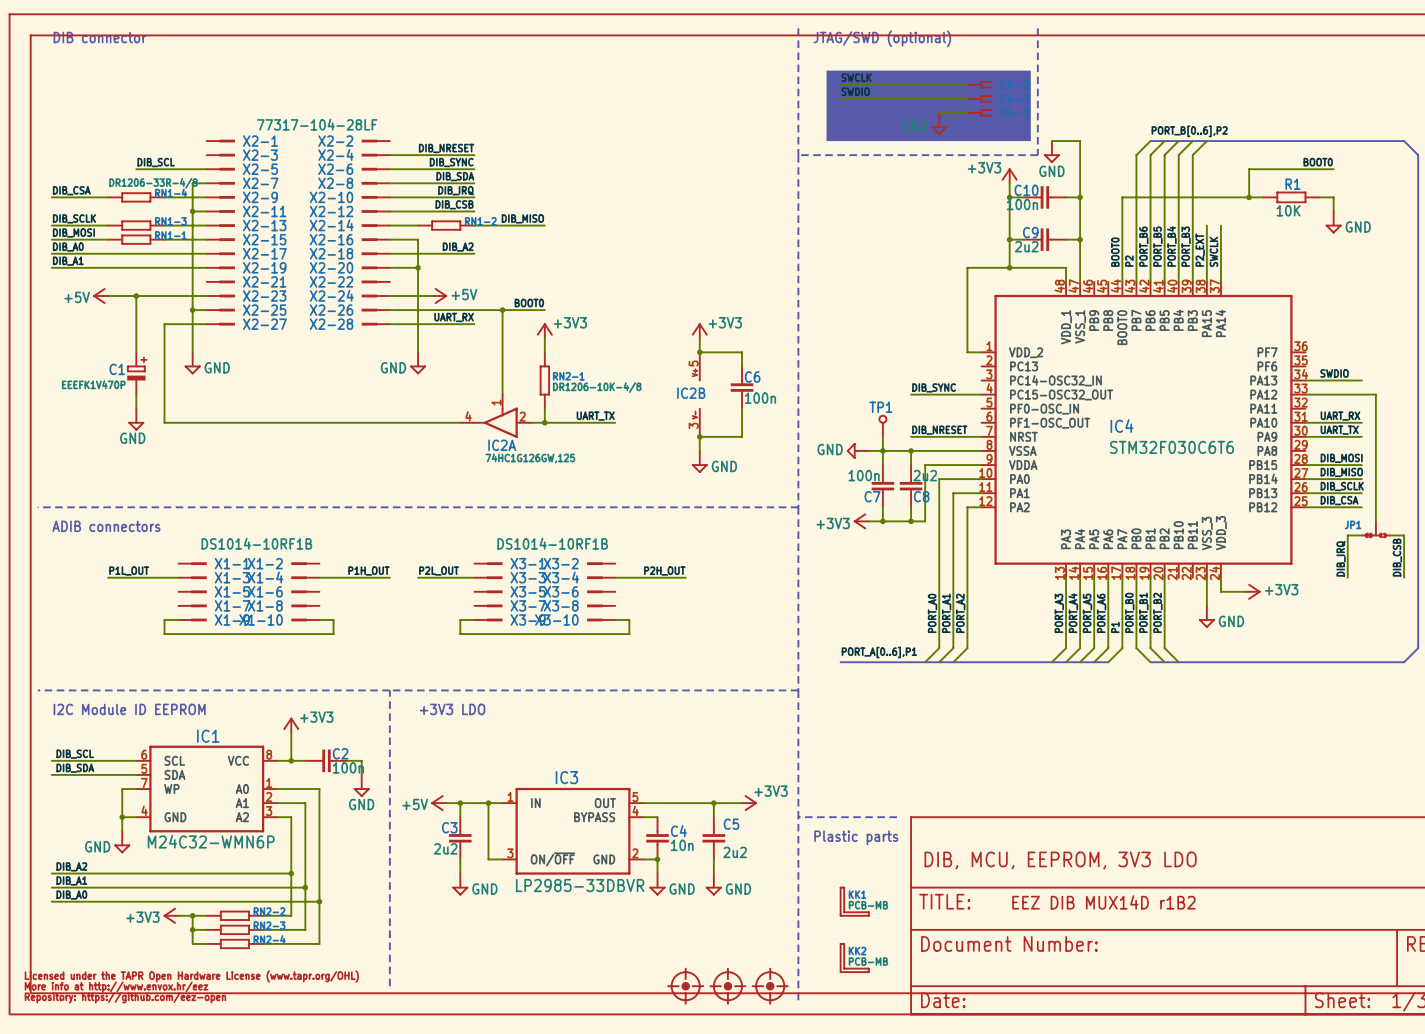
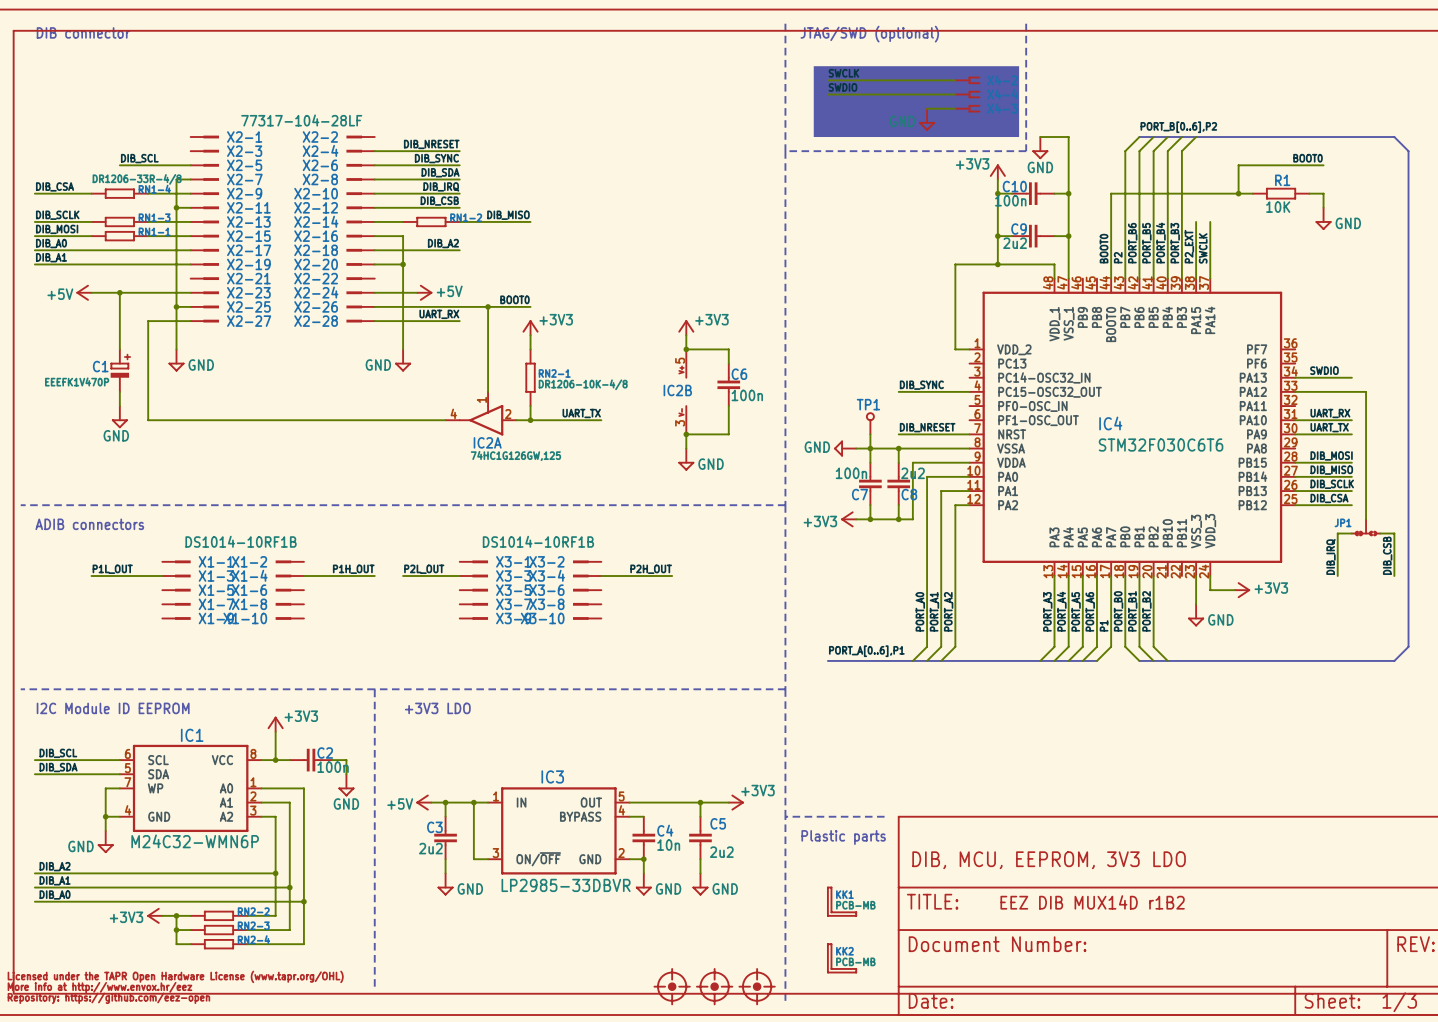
wire: (178, 619) (164, 619) (164, 634) (333, 634) (333, 619) (319, 619) -> none
wire: (474, 619) (460, 619) (460, 634) (629, 634) (629, 619) (615, 619) -> none

